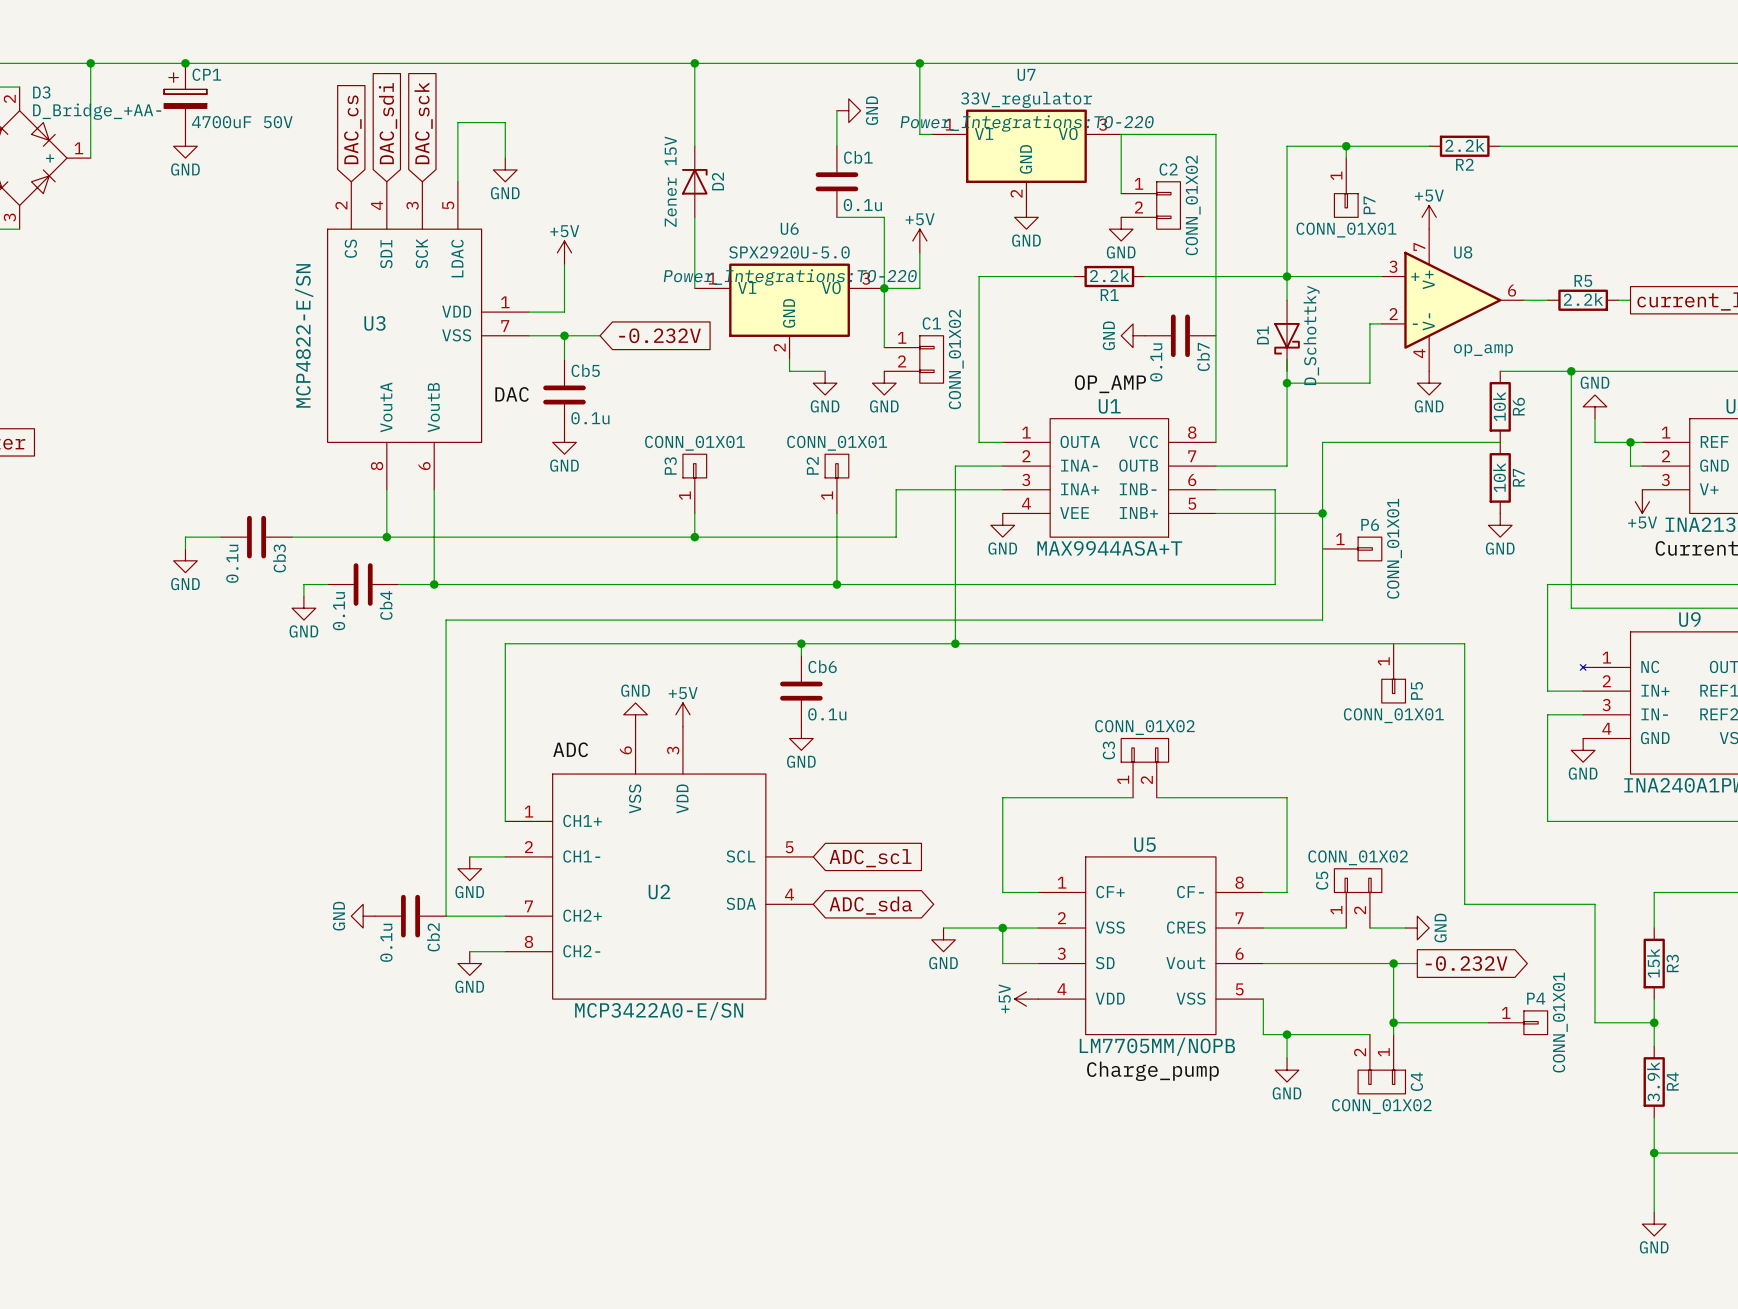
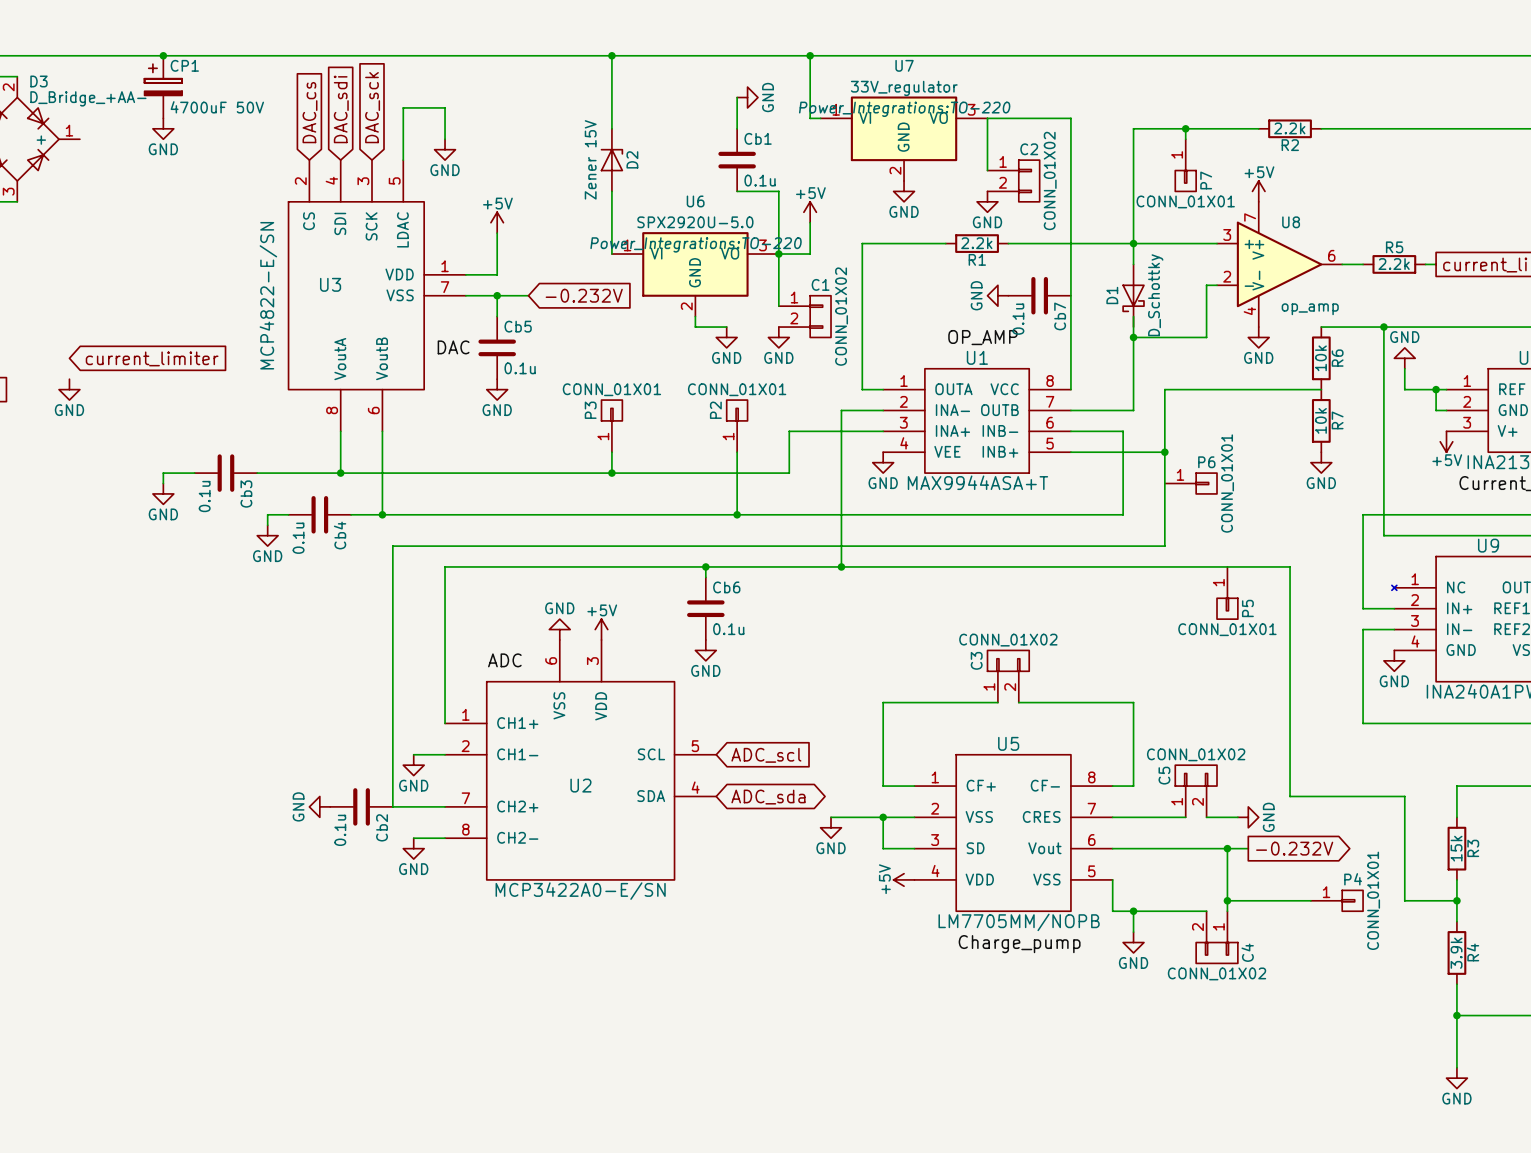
wire: (90, 63) (90, 158) -> none
junction: (90, 63) -> none
global label: none -> current_limiter (152, 358)
power symbol: none -> GND (69, 389)

